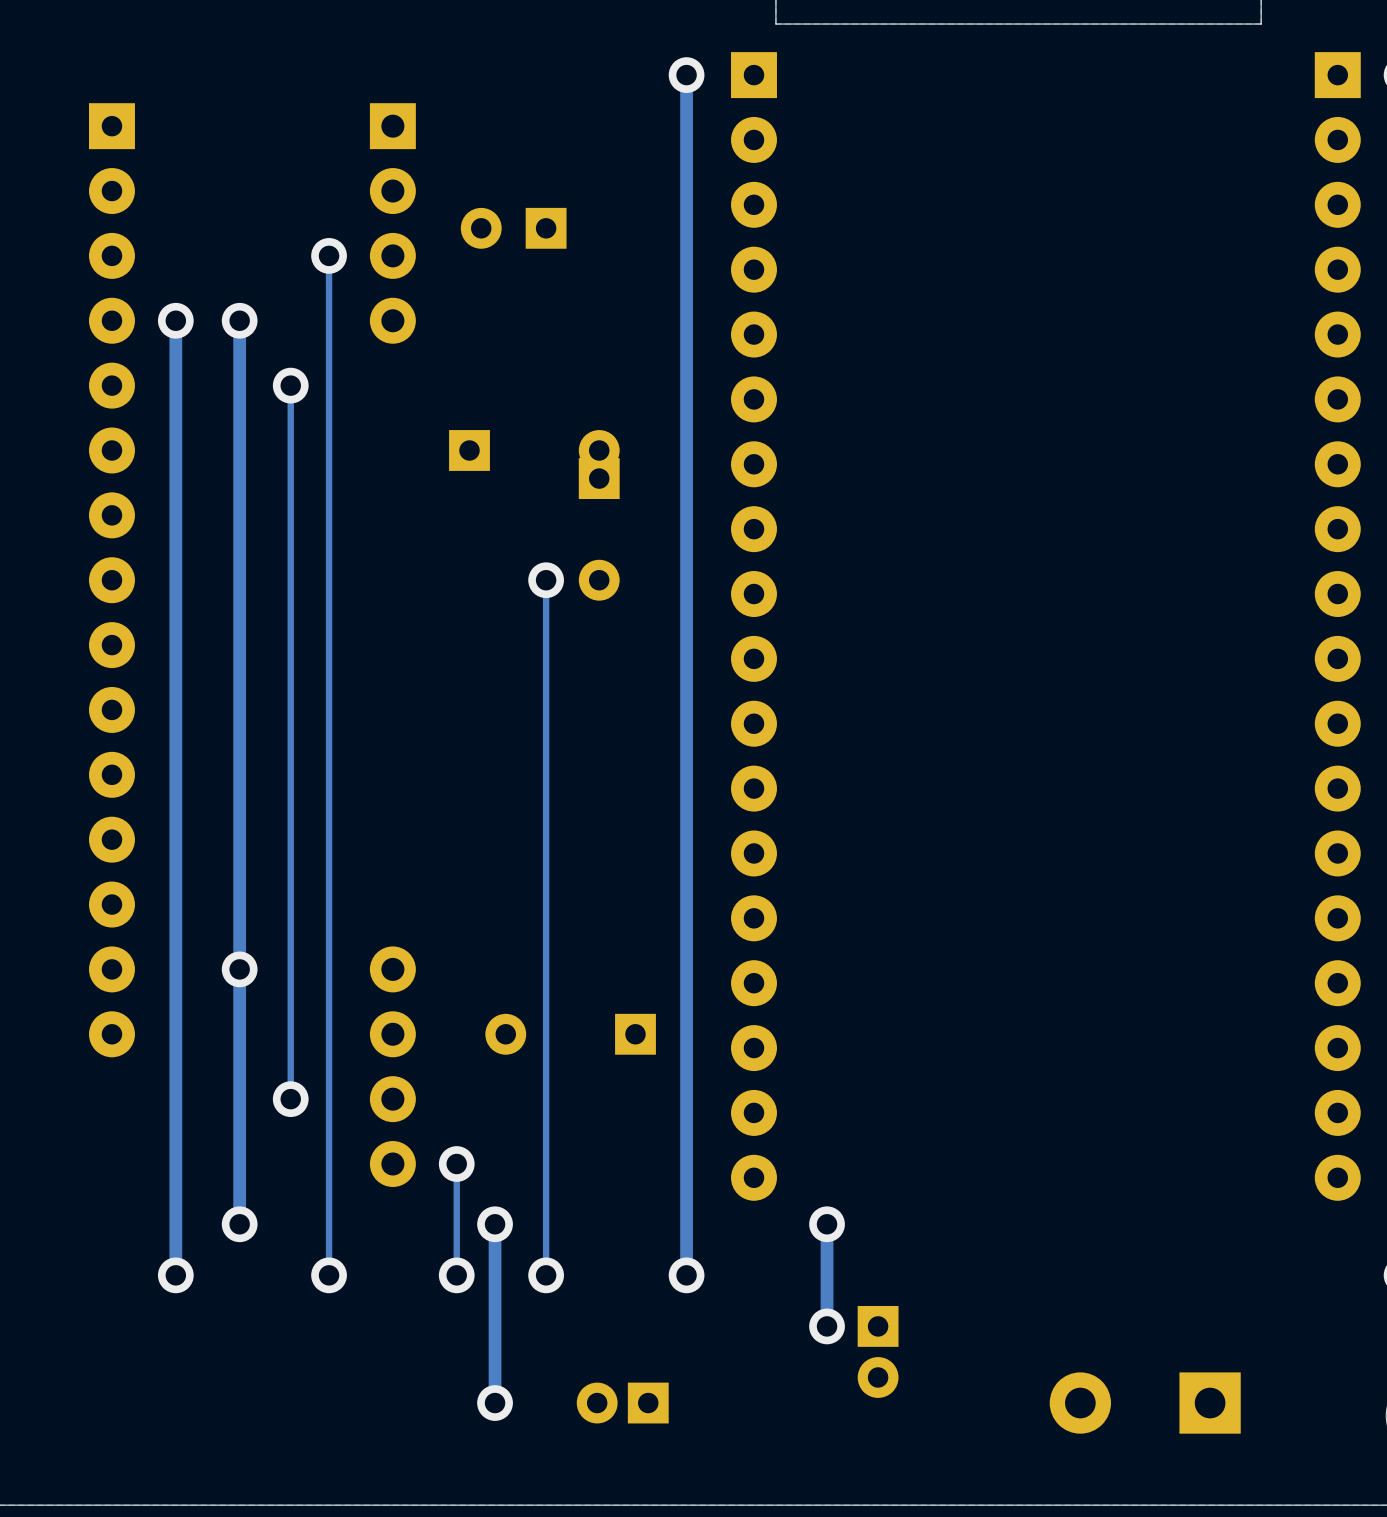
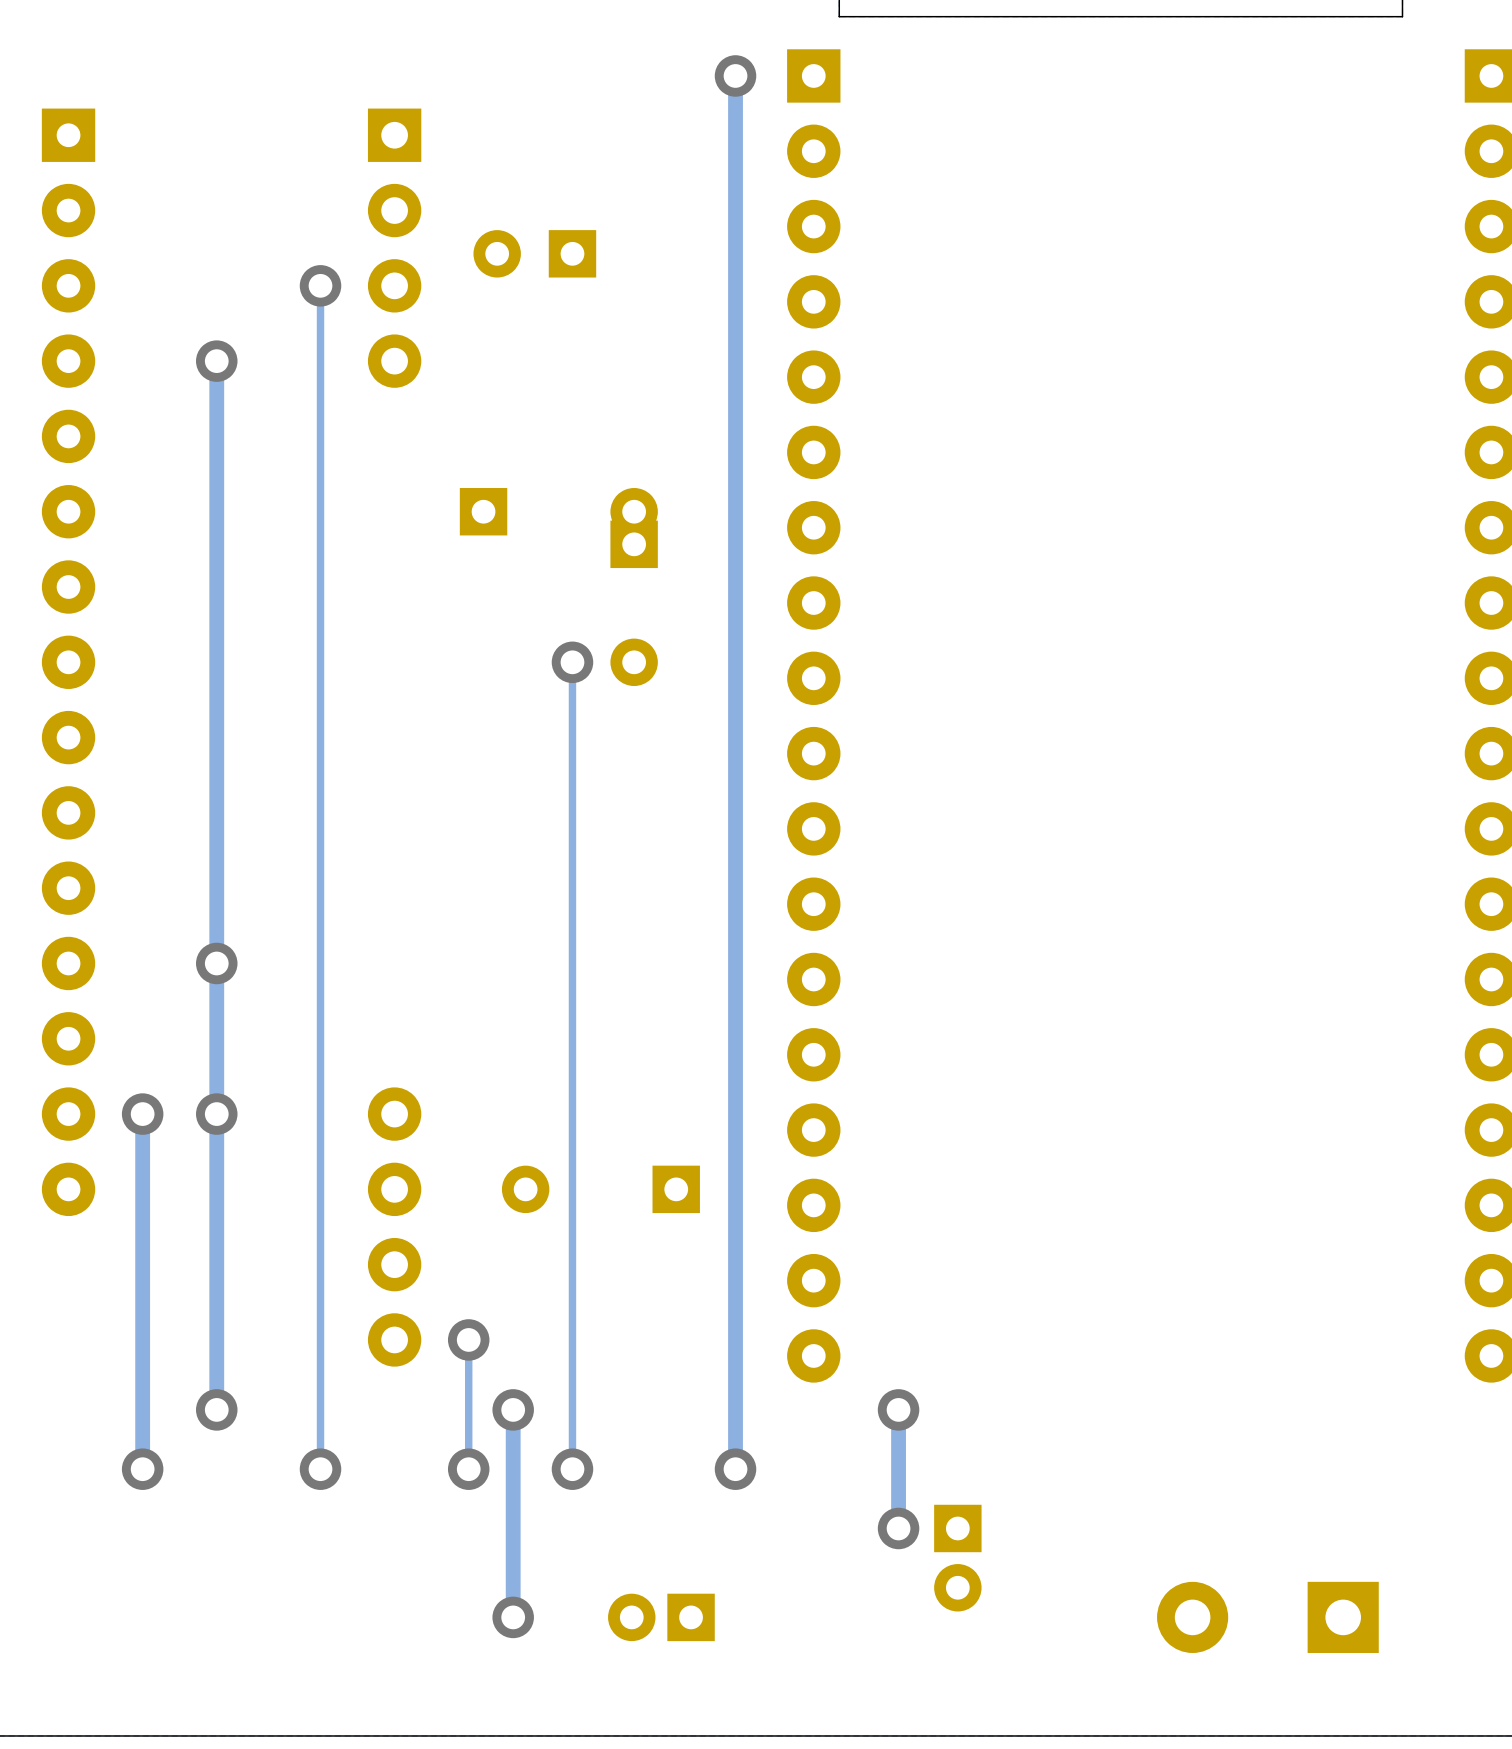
track: (175, 320) (175, 969) -> none
via: (175, 320) -> none
track: (290, 385) (290, 1099) -> none
via: (290, 385) -> none
via: none -> (216, 963)
via: none -> (142, 1114)
via: (290, 1099) -> none

